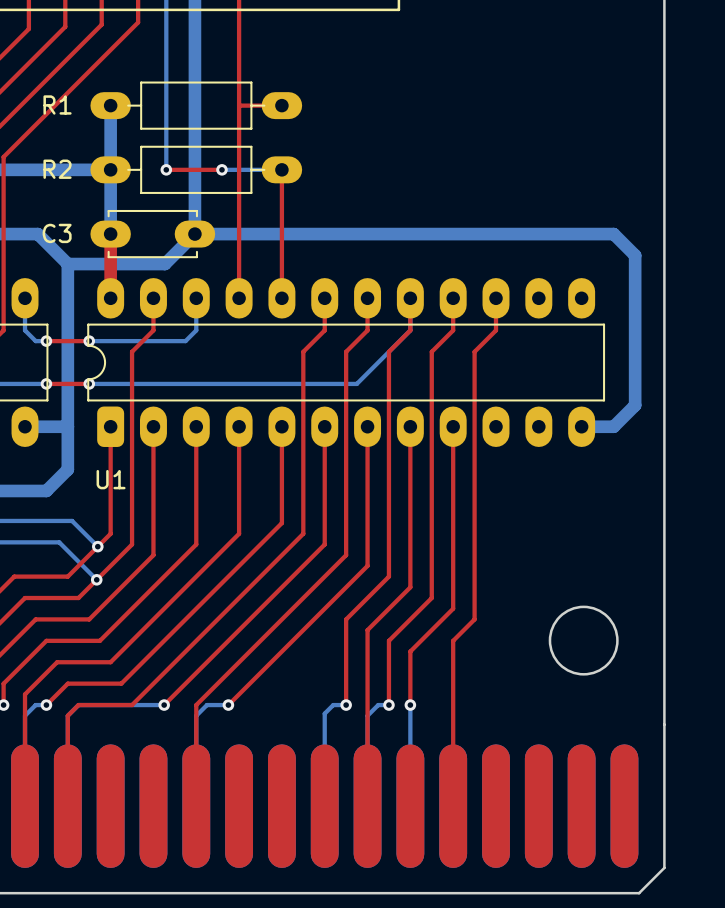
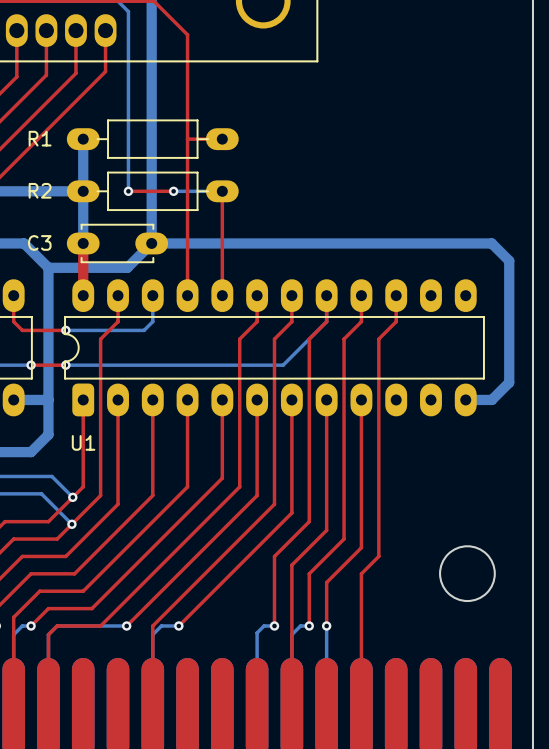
top track: none -> (13, 295) (13, 321) (22, 330) (31, 330)
bottom track: (25, 298) (25, 330) (35, 341) (46, 341) -> none
via: (46, 341) -> none

